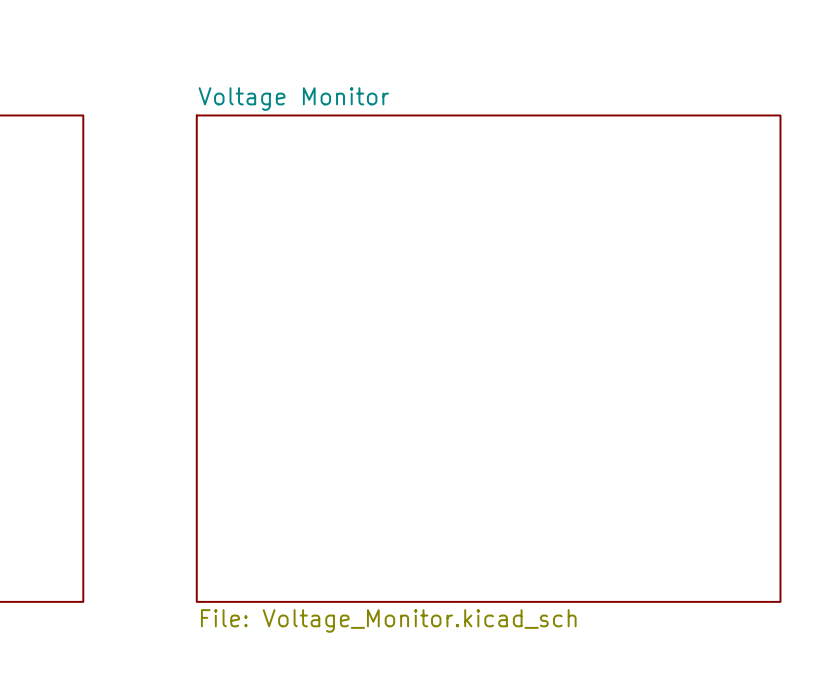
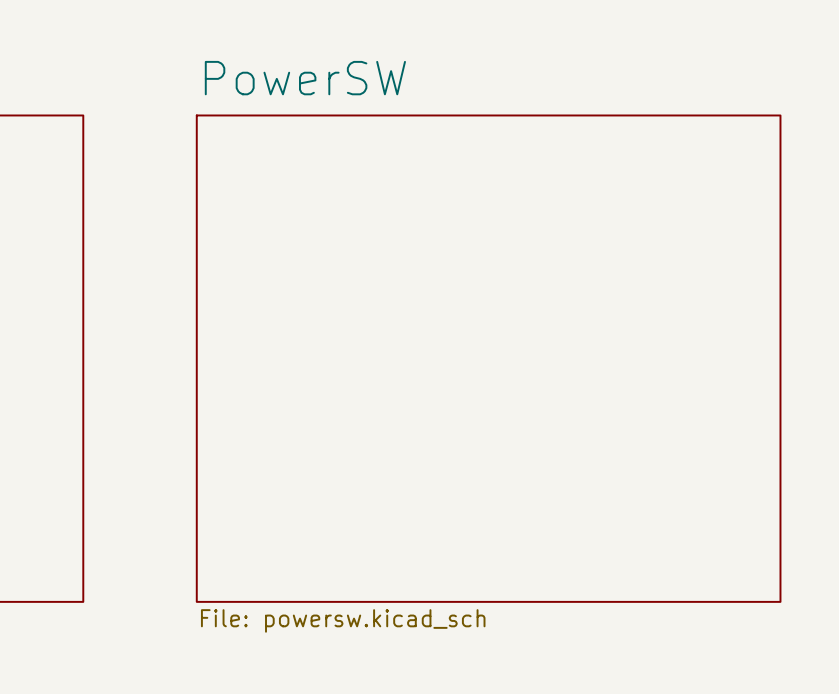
sheet Voltage Monitor name: Voltage Monitor (293, 99) -> PowerSW (305, 78)
sheet Voltage Monitor value: File: Voltage_Monitor.kicad_sch (388, 620) -> File: powersw.kicad_sch (343, 620)

